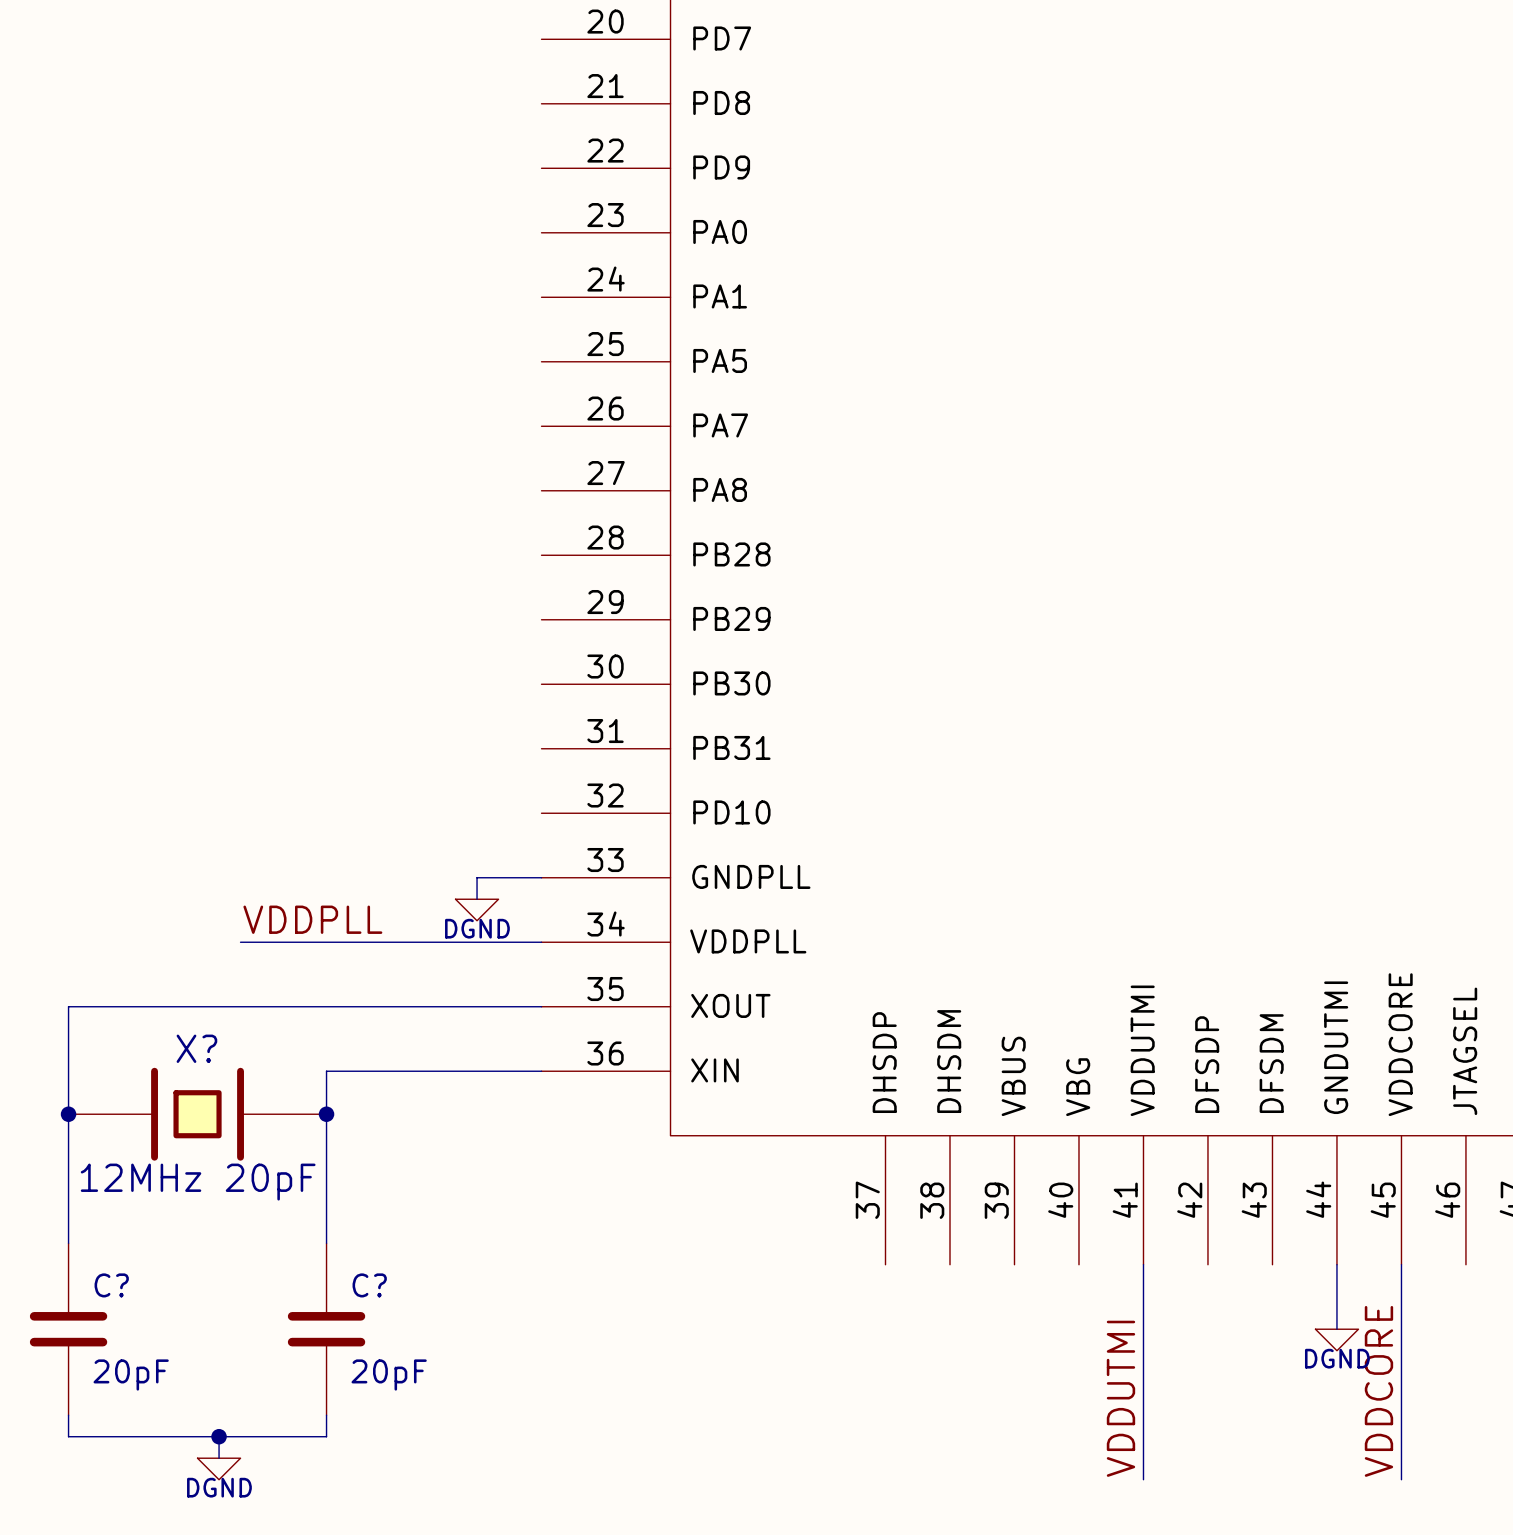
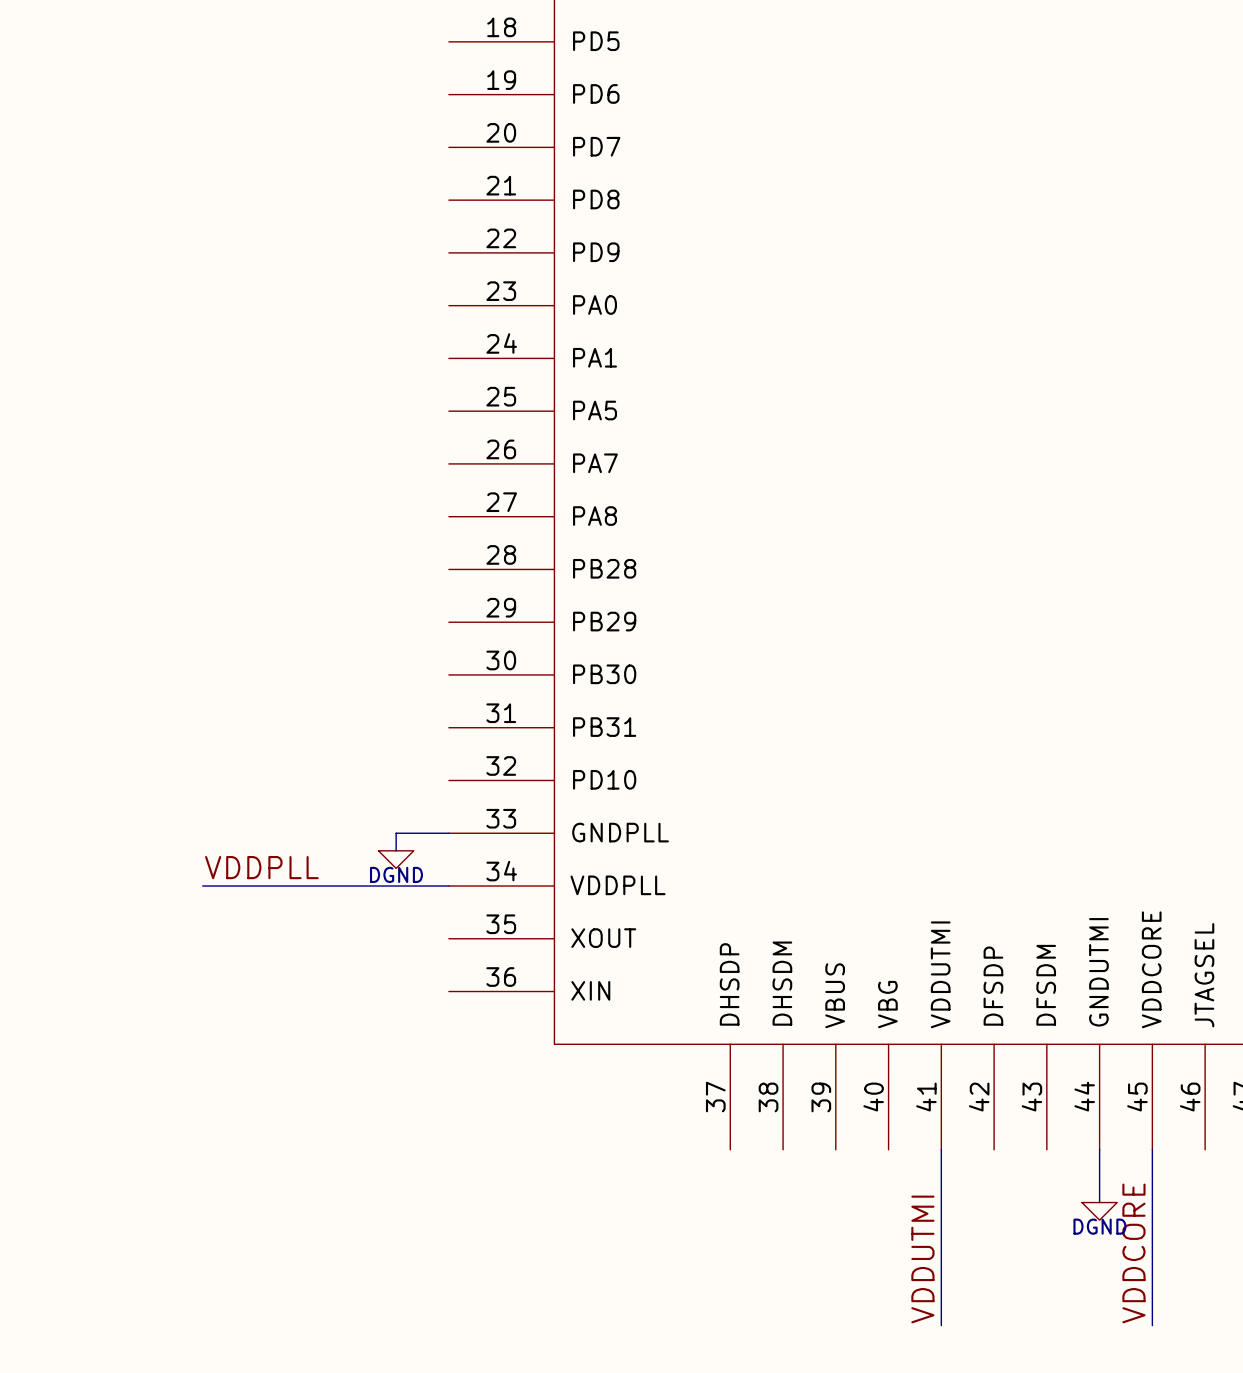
wire: (541, 1006) (68, 1006) (68, 1243) -> none
wire: (541, 1071) (326, 1071) (326, 1243) -> none
junction: (68, 1114) -> none
X?: 12MHz 20pF (197, 1114) -> none
junction: (326, 1114) -> none
C?: 20pF (68, 1329) -> none
C?: 20pF (326, 1329) -> none
wire: (68, 1415) (68, 1436) (326, 1436) (326, 1415) -> none
wire: (219, 1436) (219, 1458) -> none
junction: (219, 1436) -> none
power symbol: DGND (219, 1468) -> none

